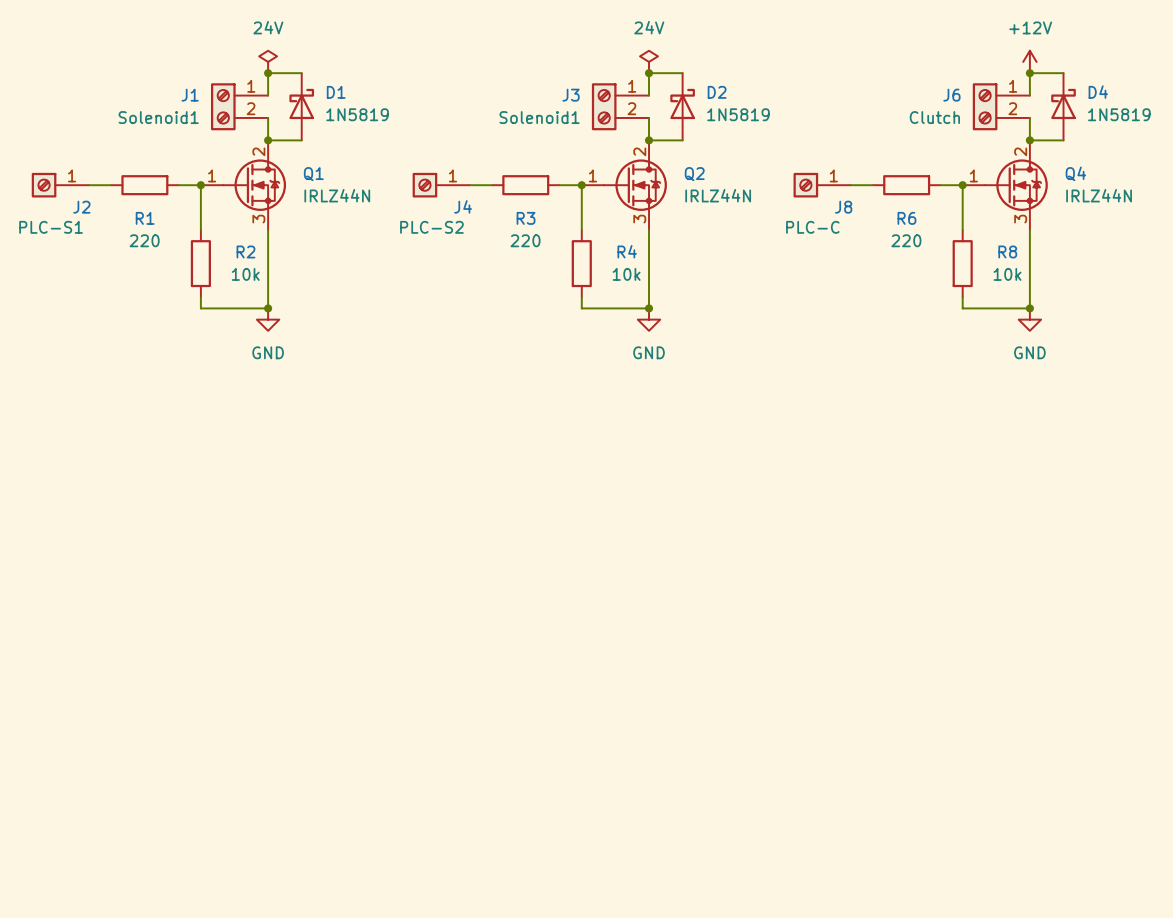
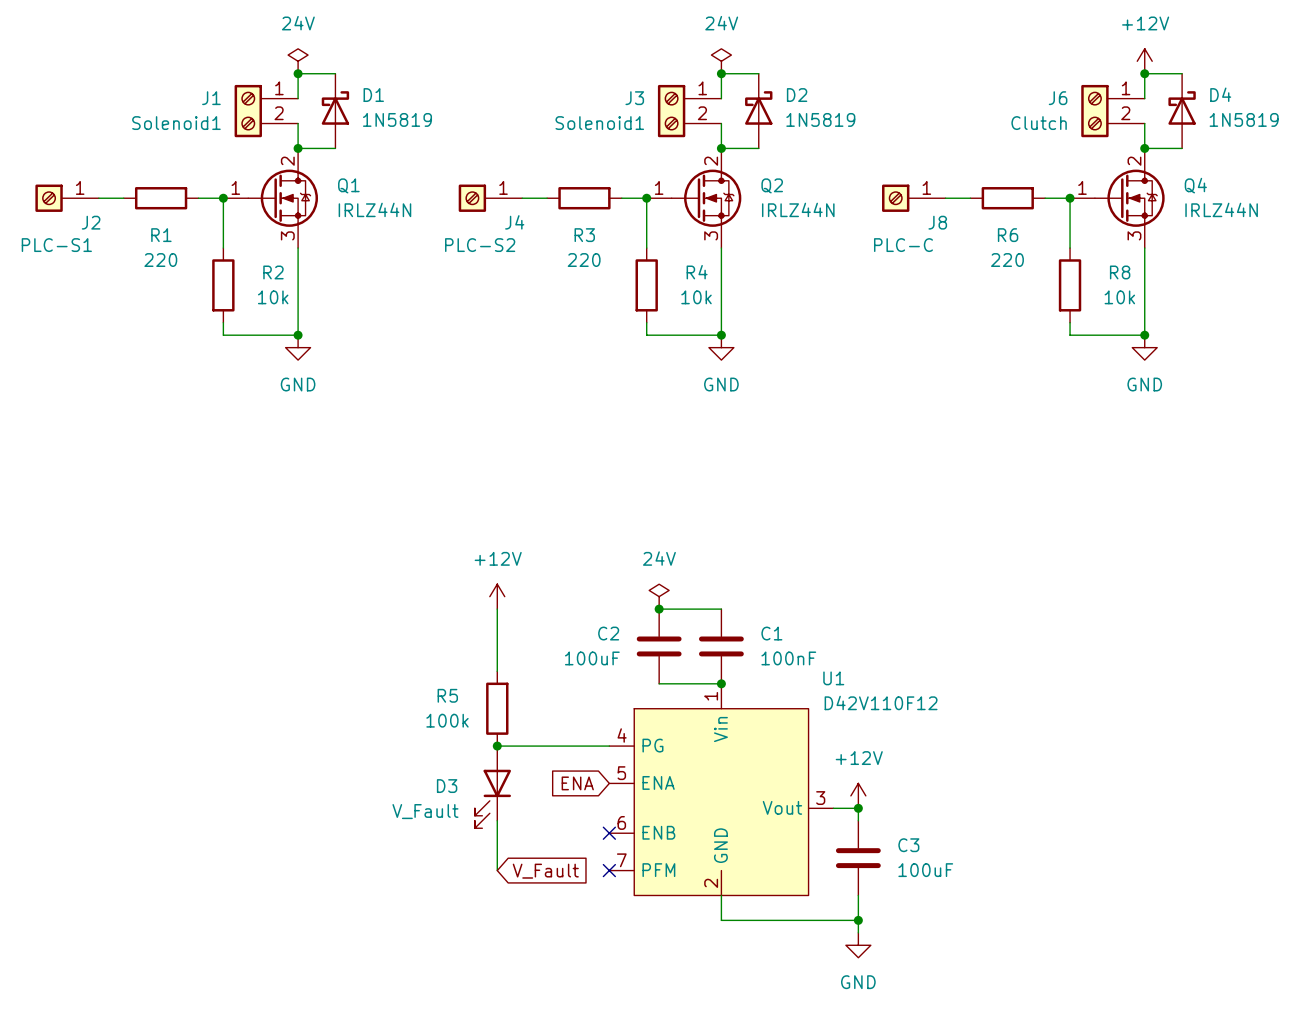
power symbol: none -> +12V (497, 596)
power symbol: none -> 24V (659, 596)
wire: none -> (497, 609) (497, 671)
wire: none -> (659, 609) (721, 609)
junction: none -> (659, 609)
C2: none -> 100uF (659, 646)
C1: none -> 100nF (721, 646)
wire: none -> (659, 683) (721, 683)
junction: none -> (721, 683)
R5: none -> 100k (497, 708)
wire: none -> (497, 746) (609, 746)
junction: none -> (497, 746)
global label: none -> ENA (577, 783)
D3: none -> V_Fault (492, 787)
U1: none -> D42V110F12 (721, 789)
power symbol: none -> +12V (858, 795)
wire: none -> (833, 808) (858, 808) (858, 820)
junction: none -> (858, 808)
wire: none -> (497, 820) (497, 870)
no-connect mark: none -> (609, 833)
C3: none -> 100uF (858, 858)
global label: none -> V_Fault (545, 871)
no-connect mark: none -> (609, 870)
wire: none -> (721, 895) (721, 920) (858, 920)
wire: none -> (858, 895) (858, 932)
junction: none -> (858, 920)
power symbol: none -> GND (858, 945)

